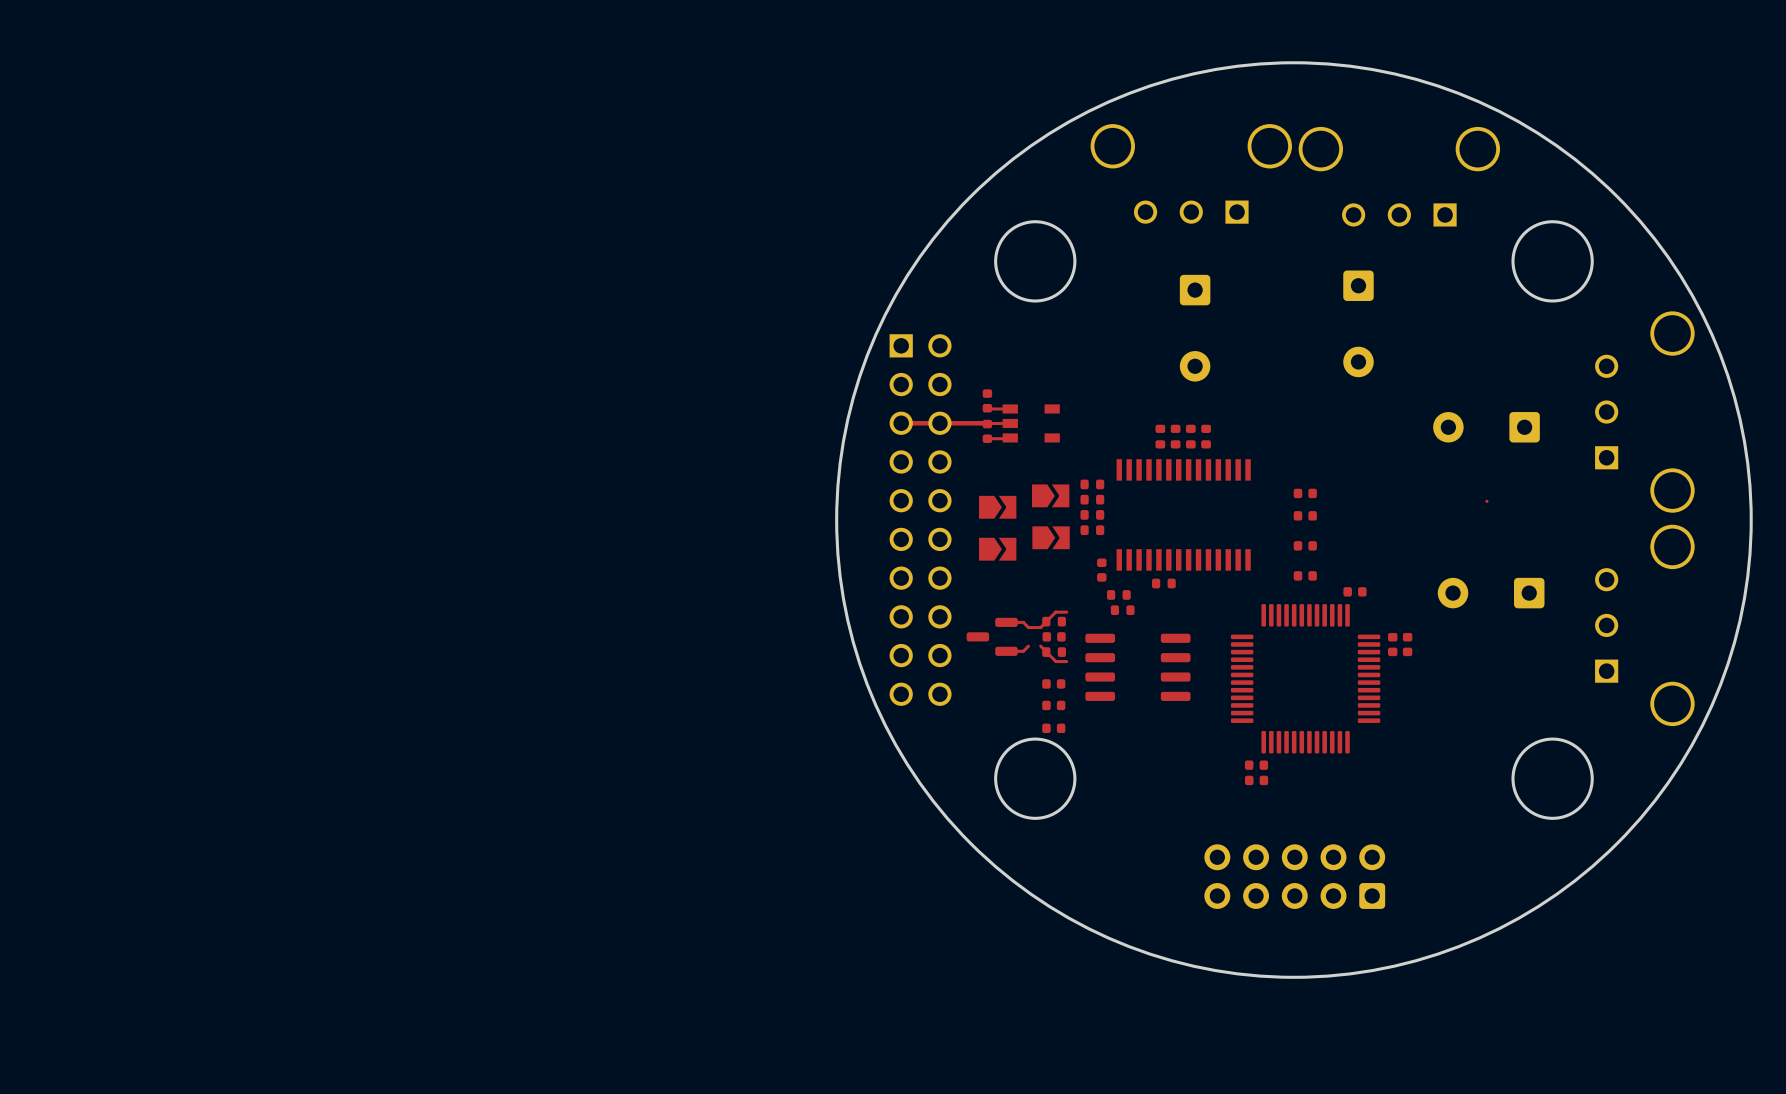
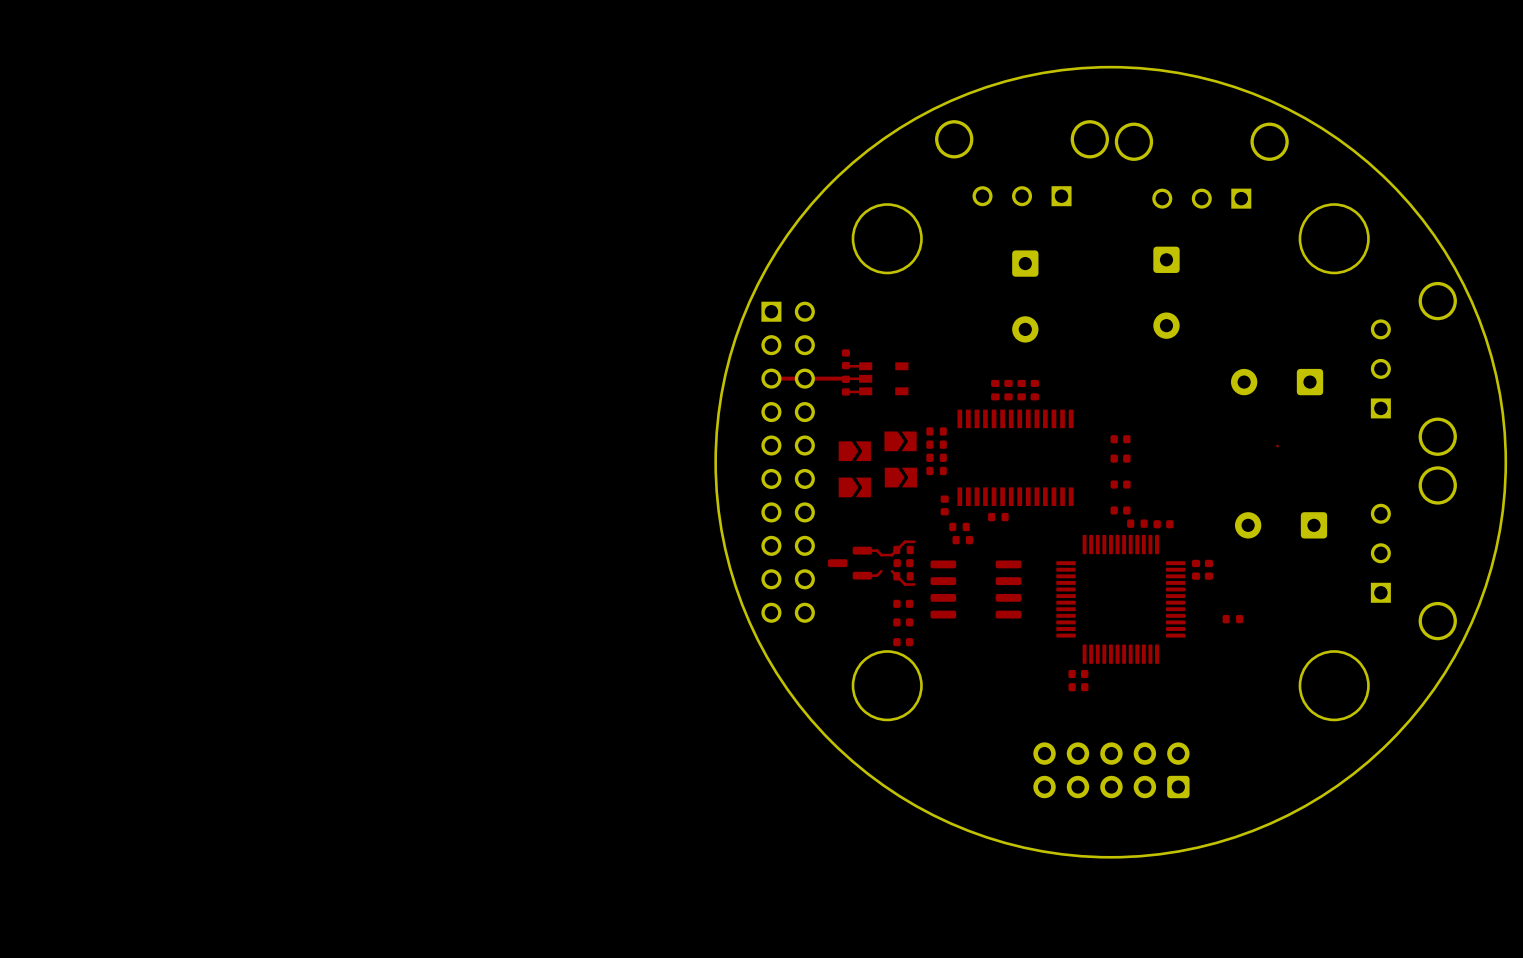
part: none -> (1137, 523)
part: none -> (1232, 619)

